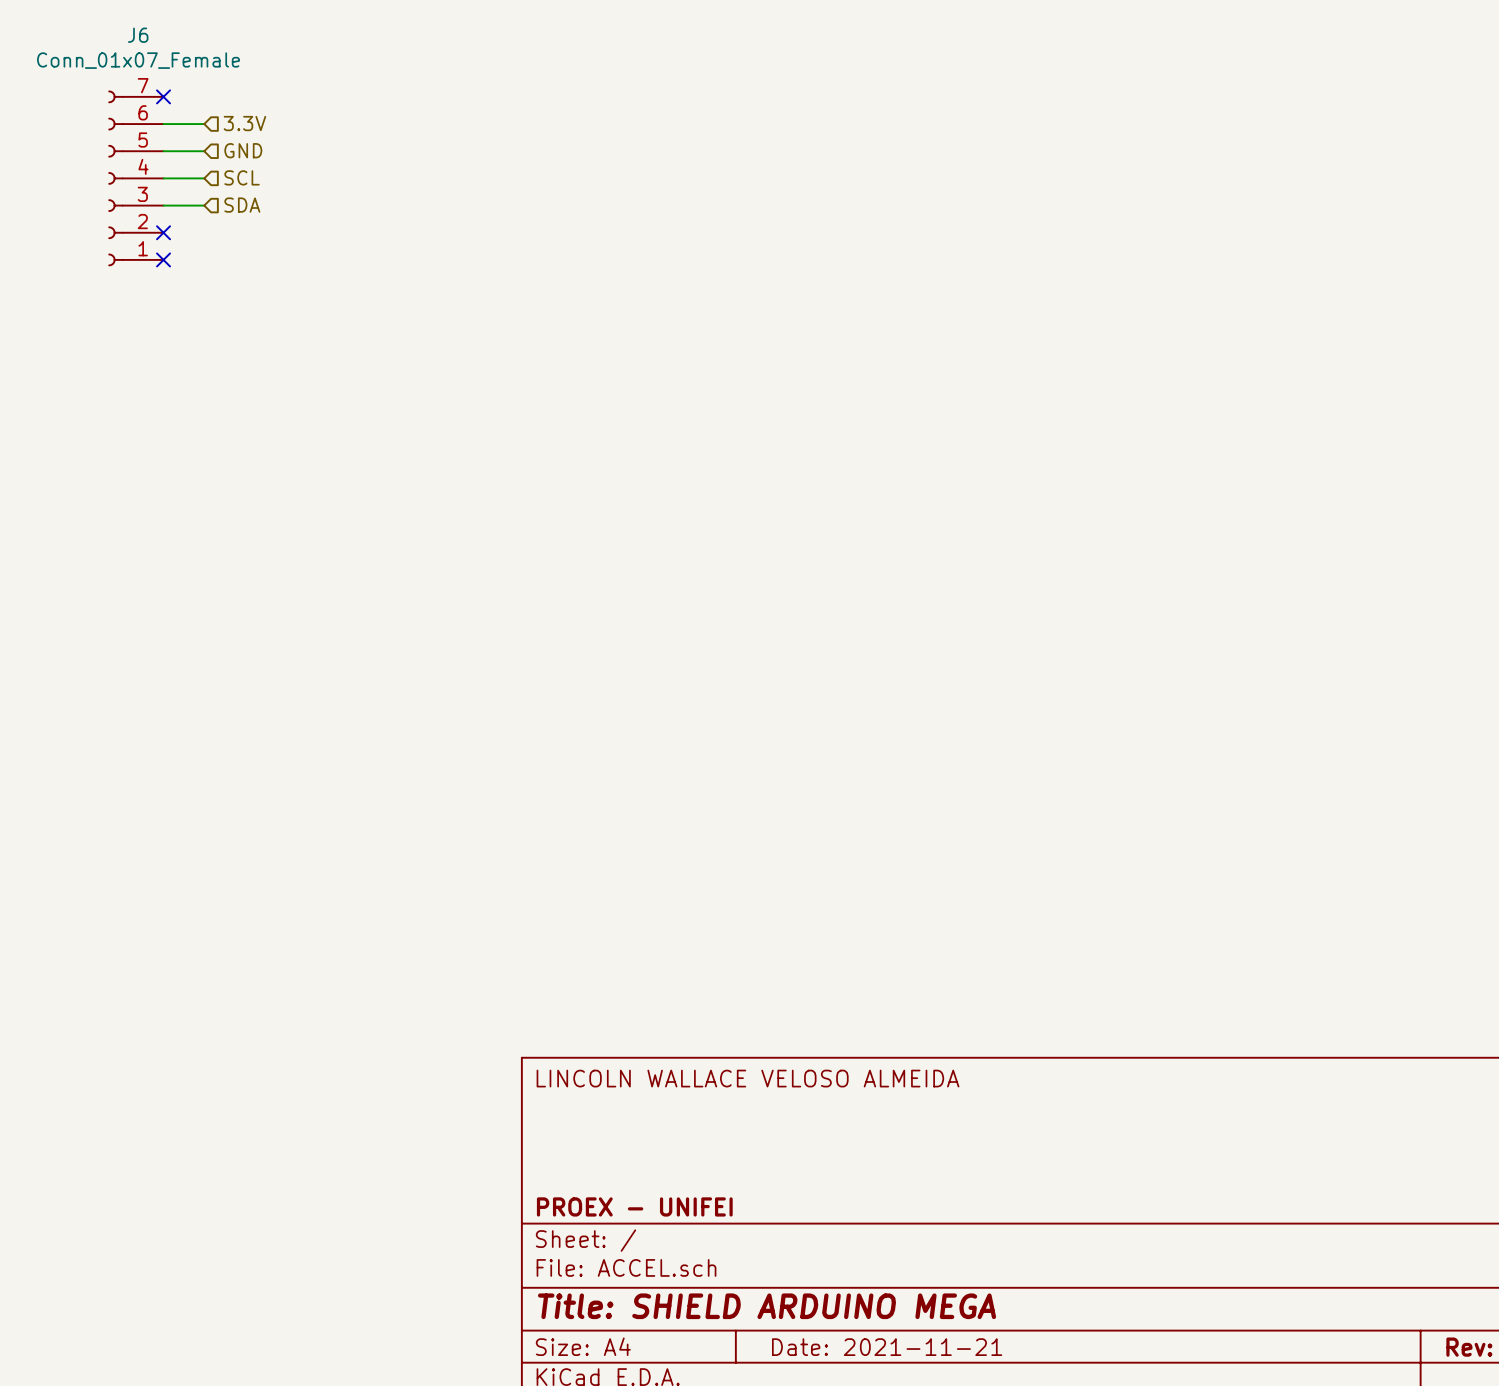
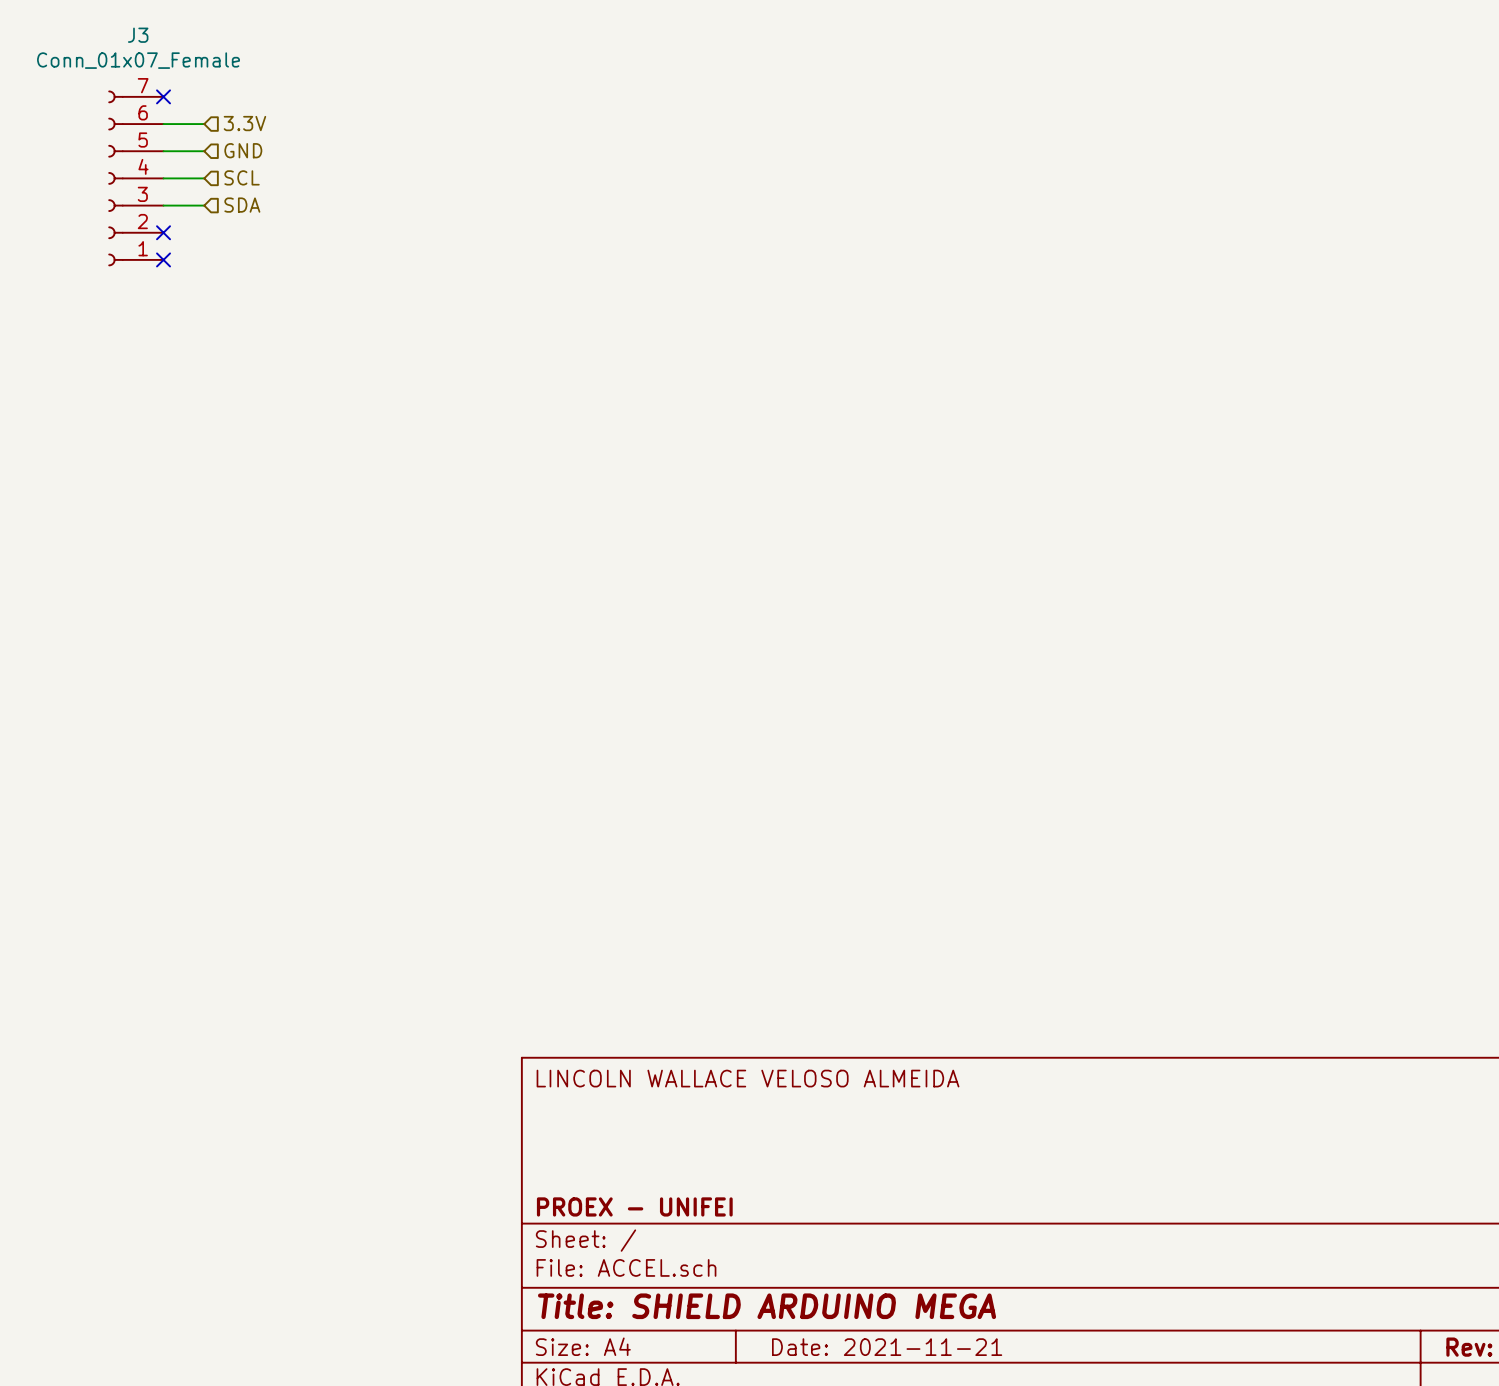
J6 name: J6 (138, 35) -> J3 (138, 35)

